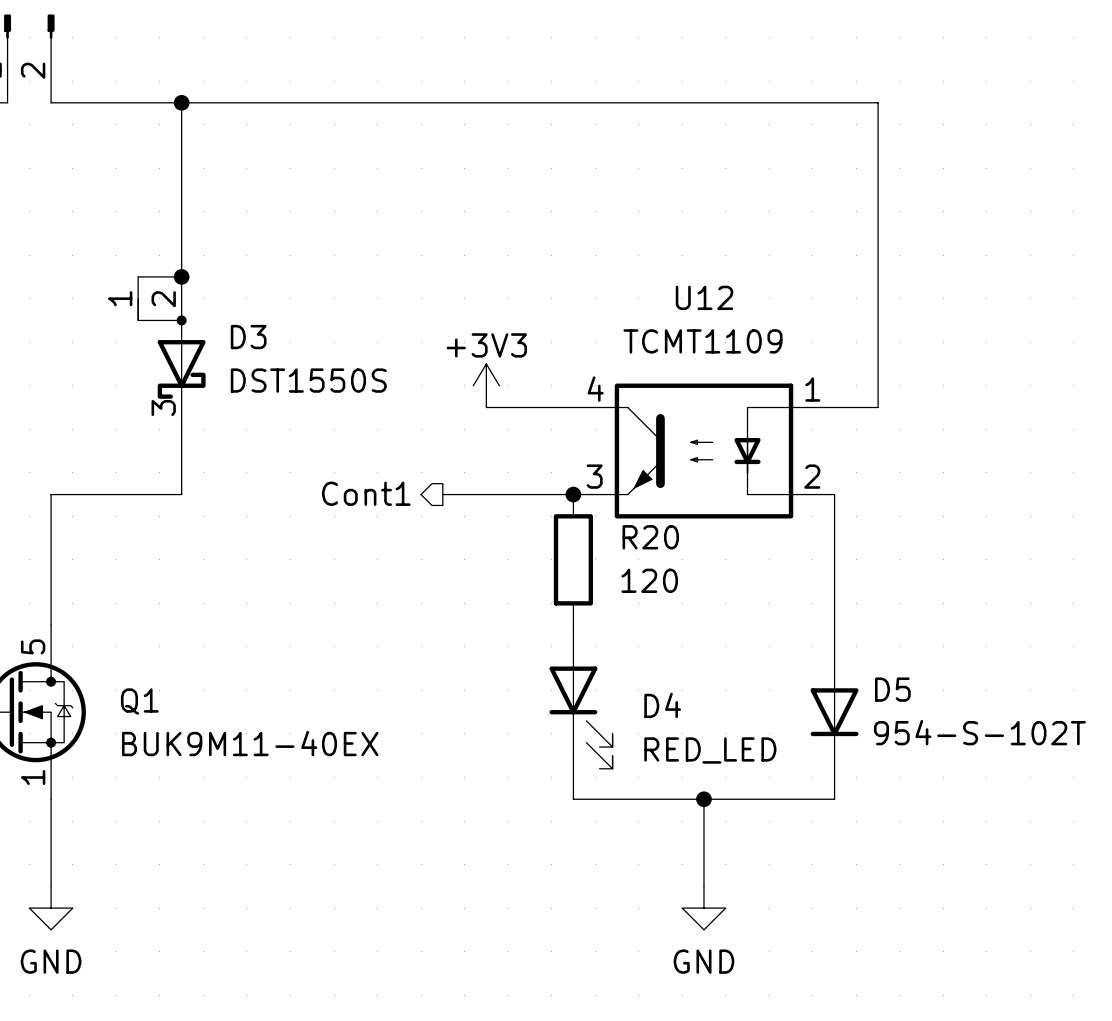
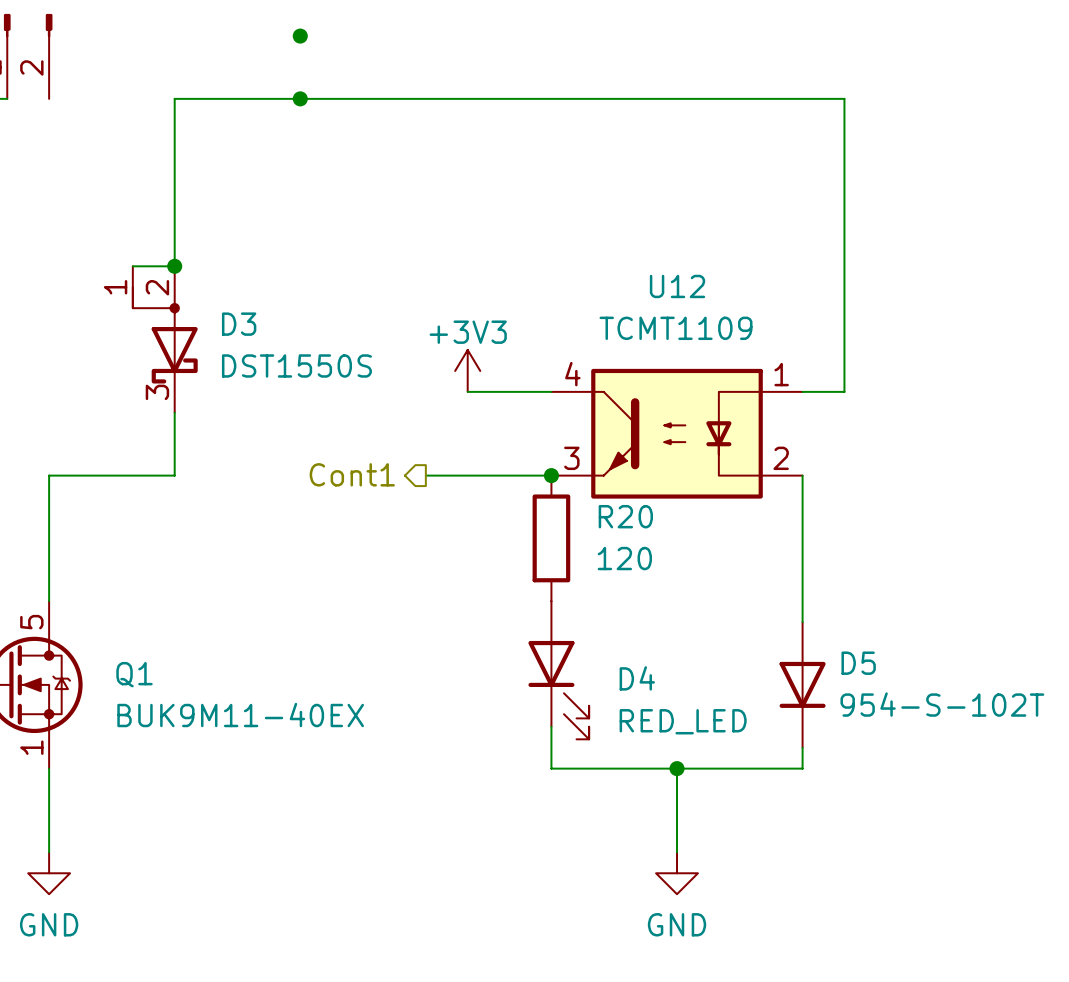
junction: none -> (300, 36)
wire: (51, 102) (181, 102) -> none
junction: (181, 102) -> none
junction: none -> (300, 98)

